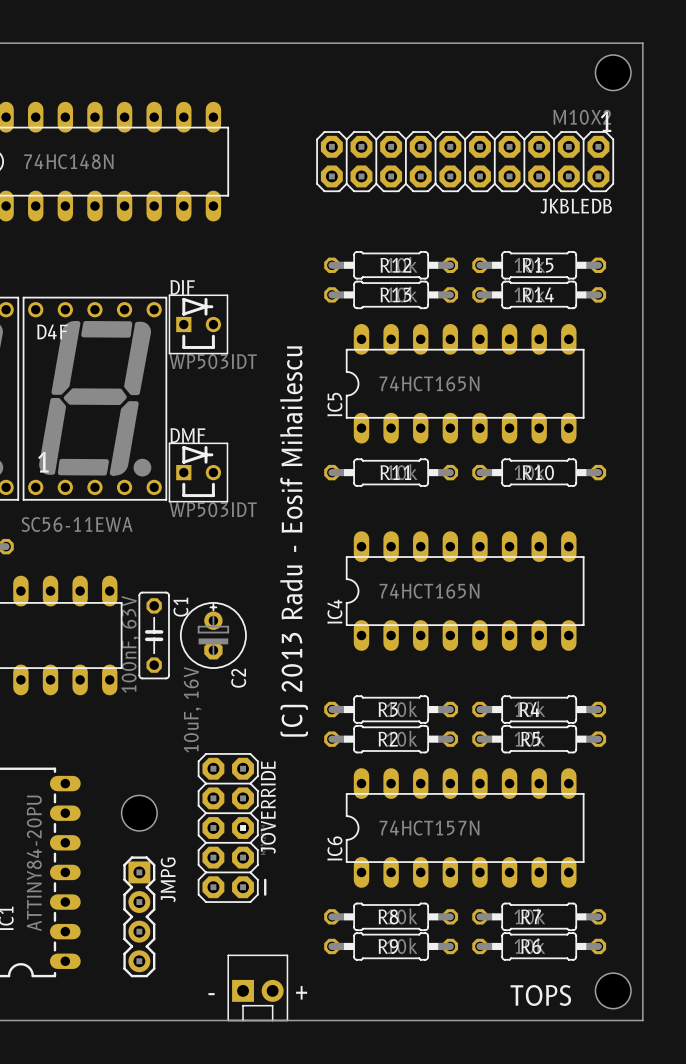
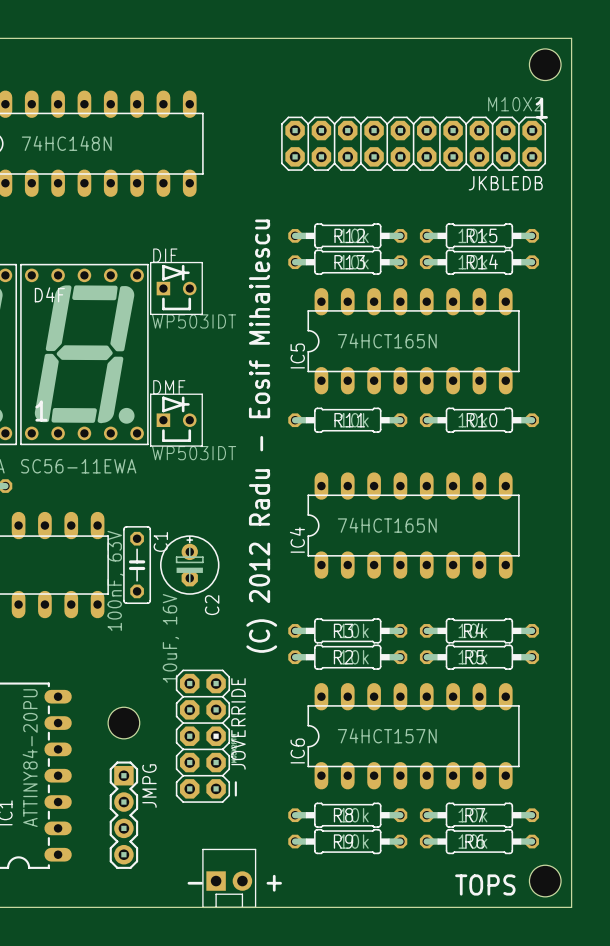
text: (C) 2013 Radu - Eosif Mihailescu (294, 541) -> (C) 2012 Radu - Eosif Mihailescu (261, 436)

